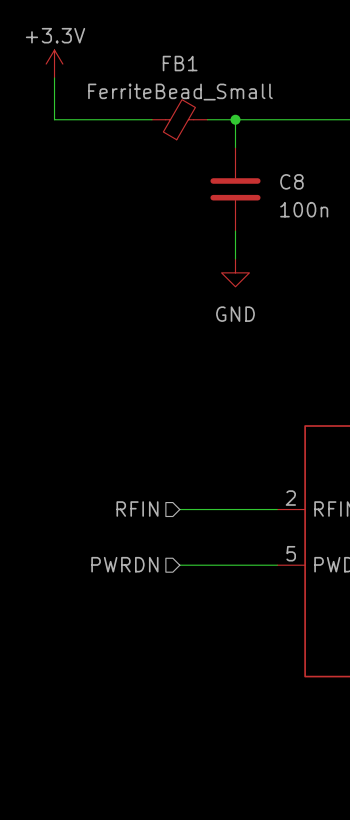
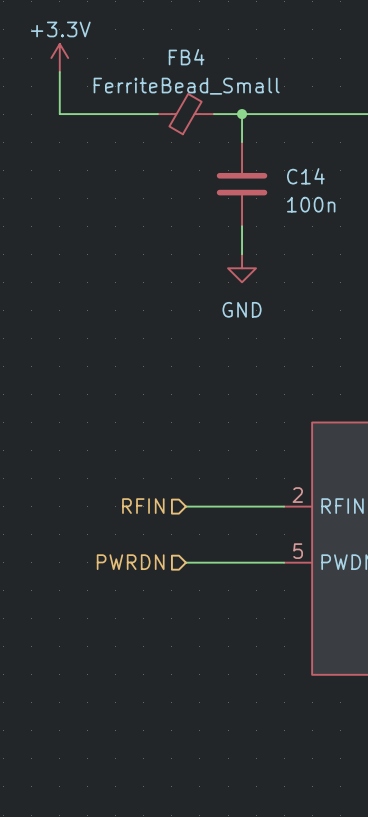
FB1 name: FB1 (180, 63) -> FB4 (186, 57)
C8 name: C8 (291, 181) -> C14 (305, 176)

